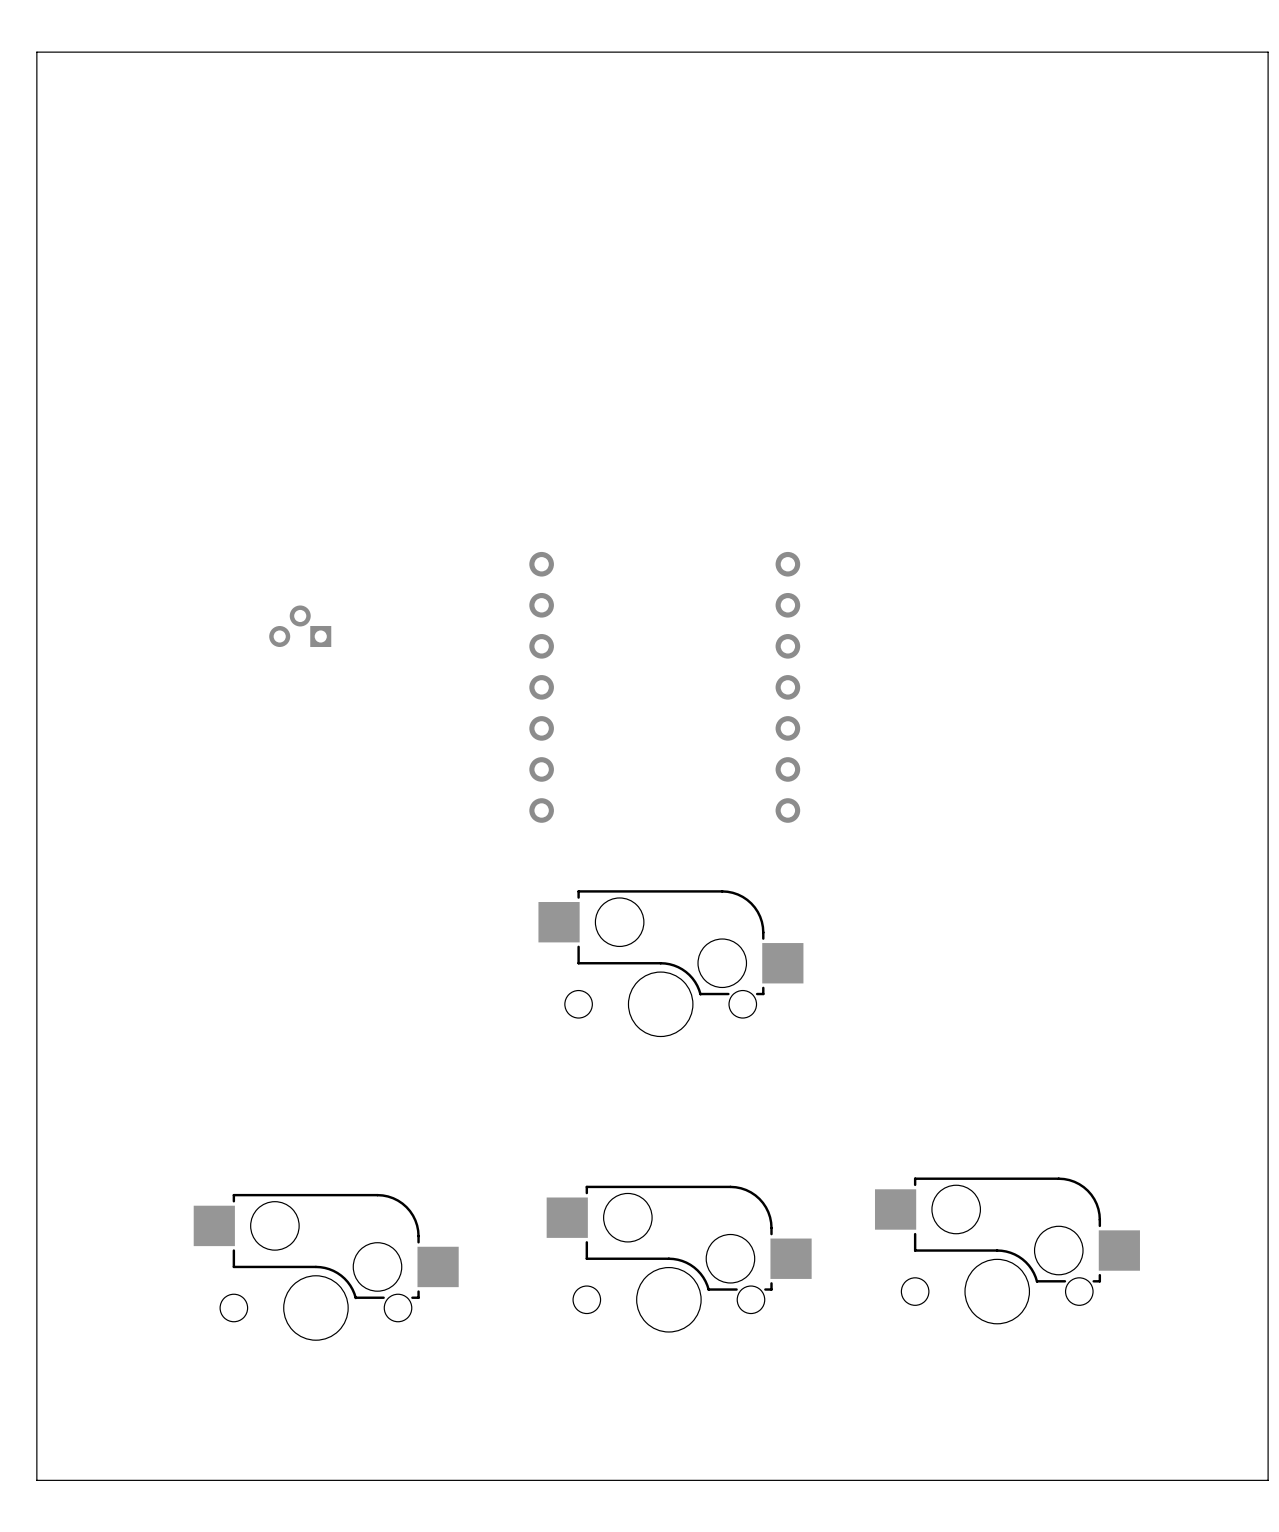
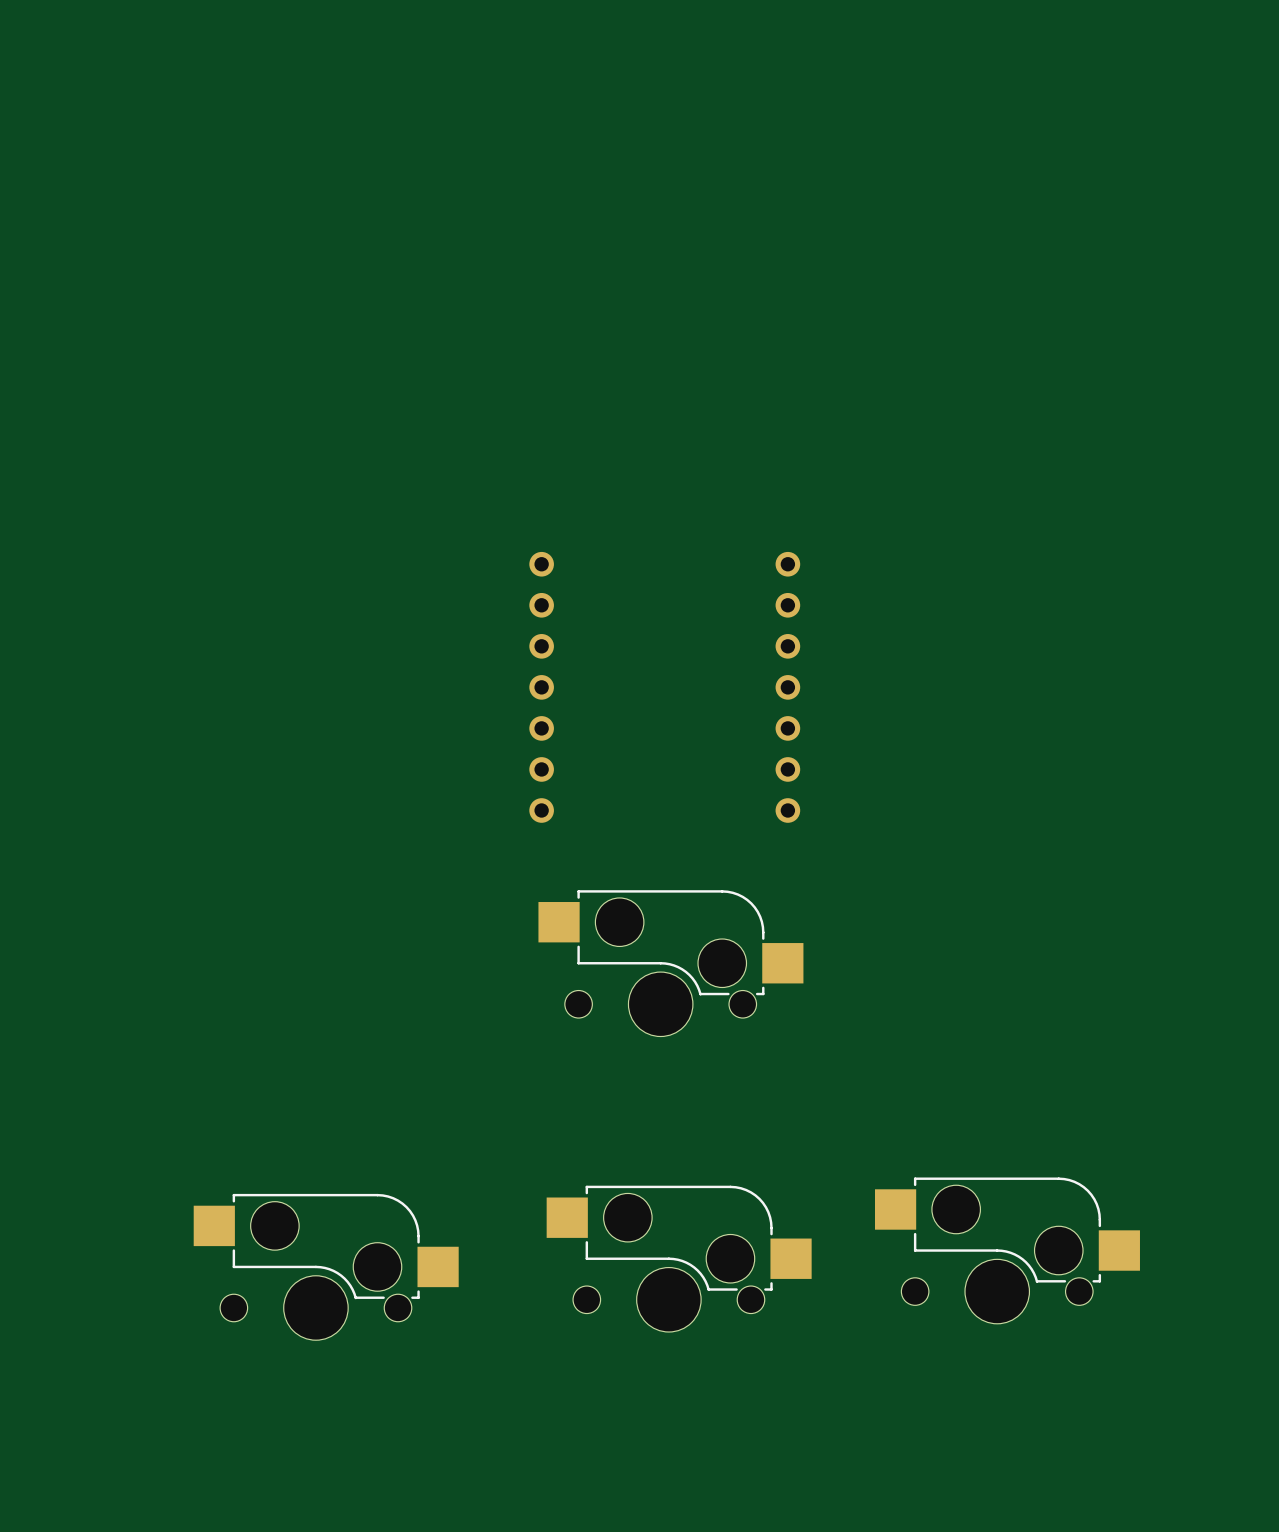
board edge: (1268, 52) (36, 52) (36, 1480) (1268, 1480) (1268, 52) -> none
part: (300, 626) -> none

